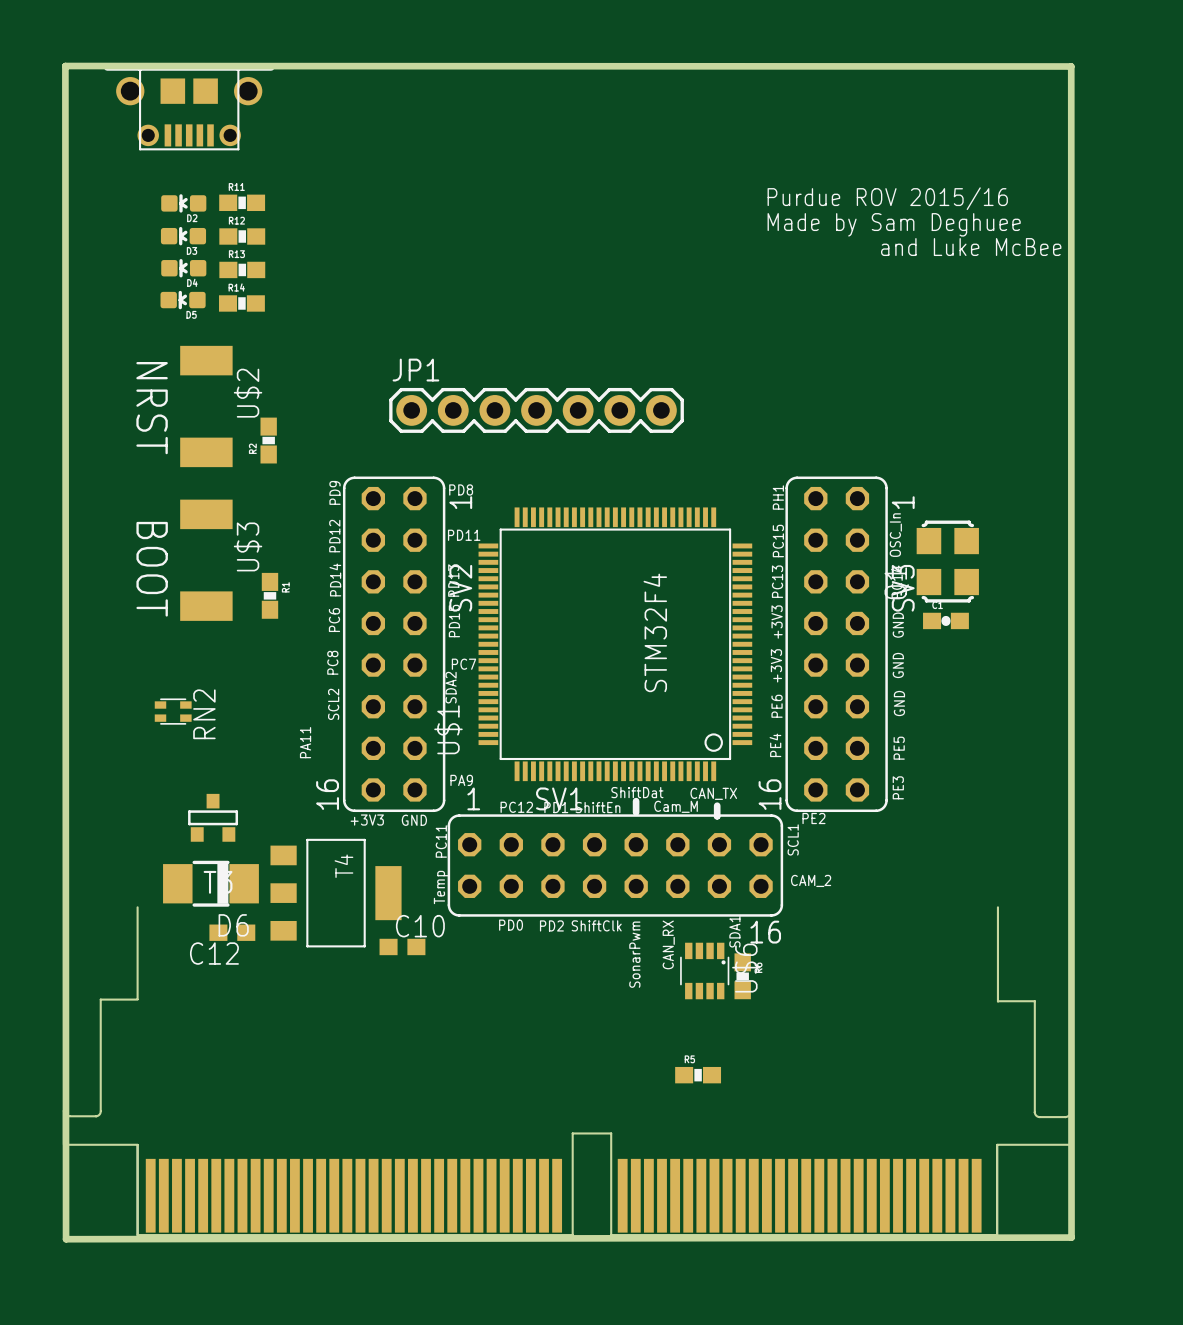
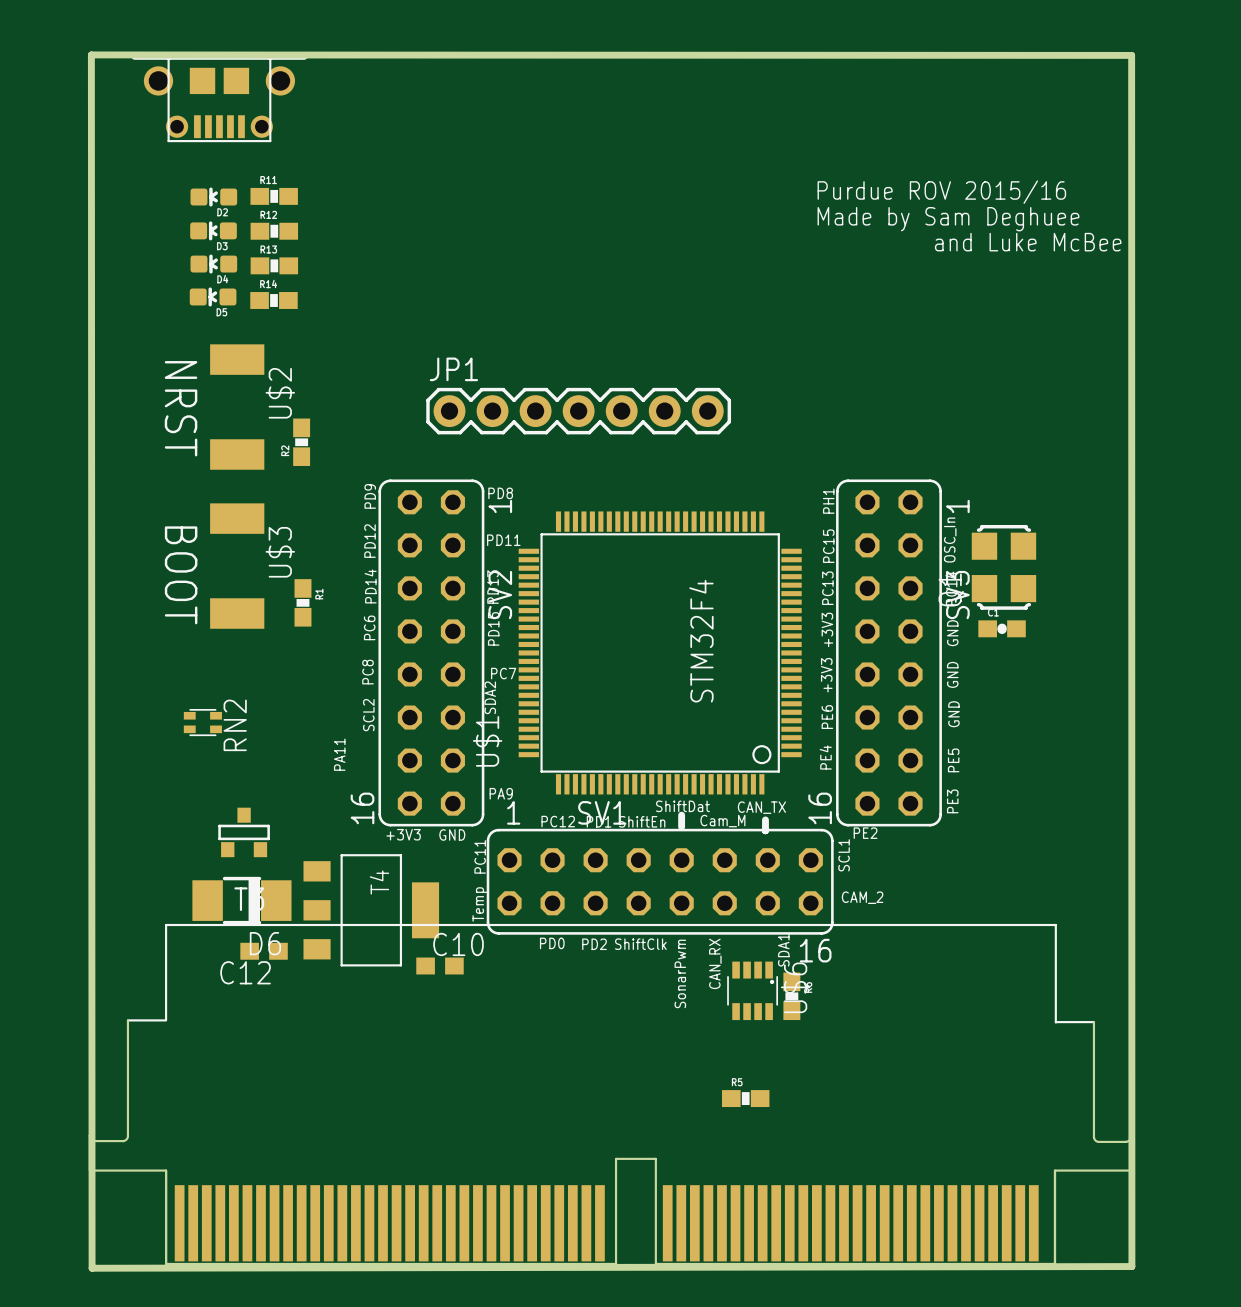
part footprint: [62, 906, 1072, 1237] -> [88, 923, 1133, 1266]

